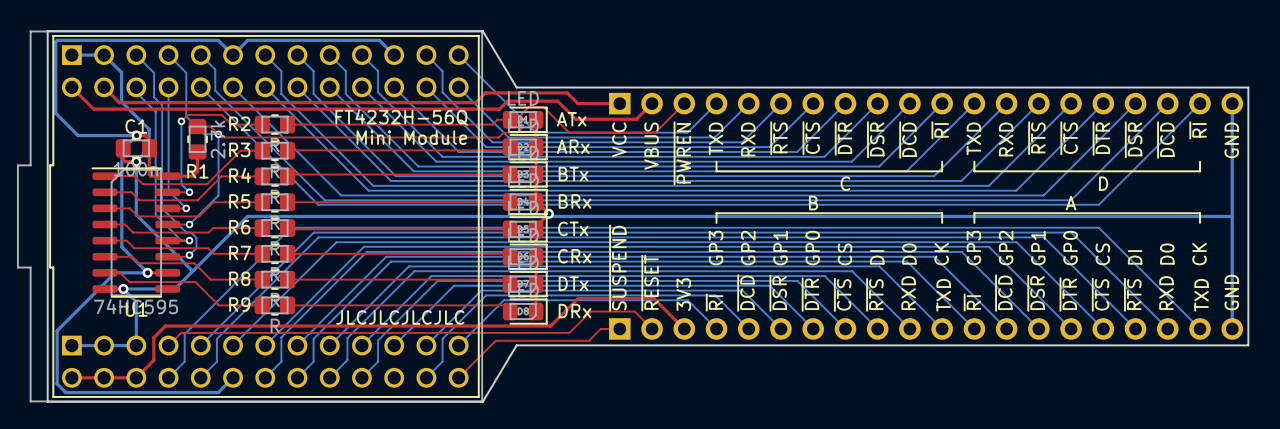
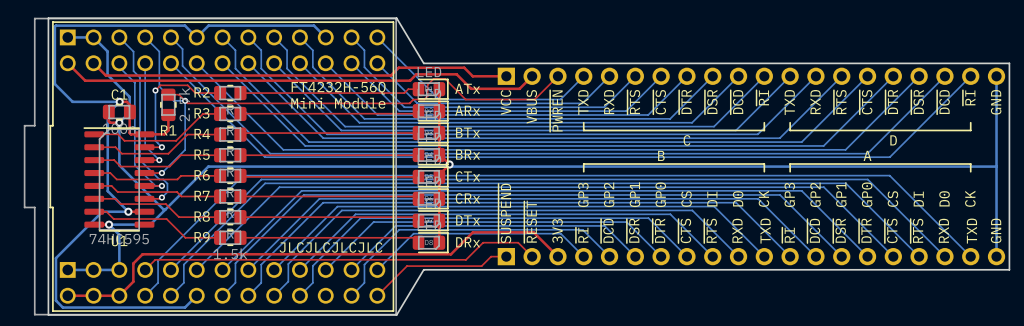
R9 value: R (275, 325) -> 1.5k (230, 253)

